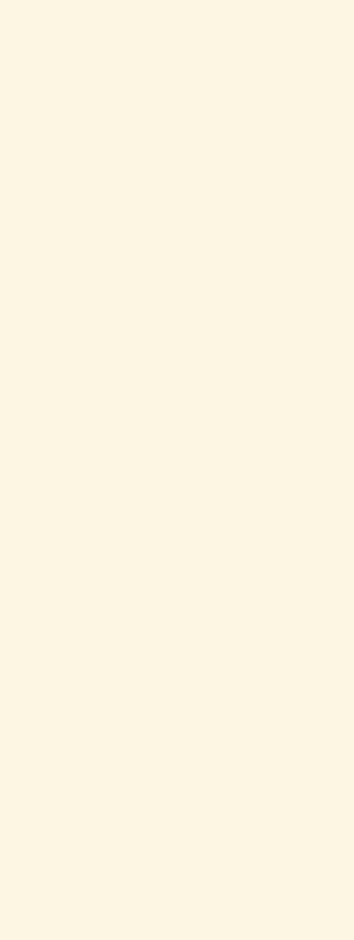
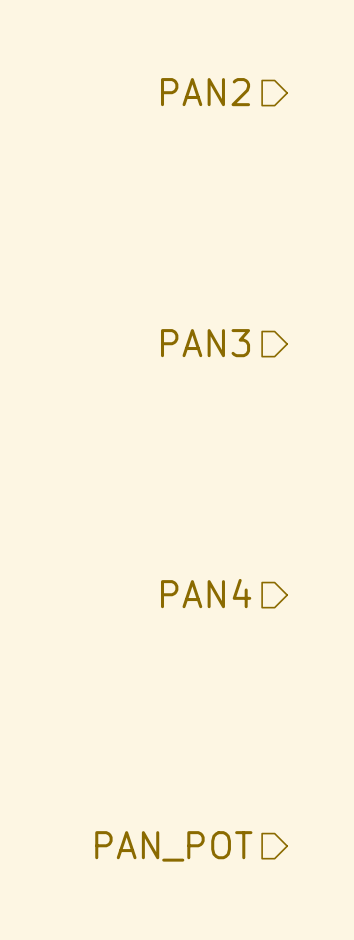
hierarchical label: none -> PAN2 (205, 92)
hierarchical label: none -> PAN3 (205, 343)
hierarchical label: none -> PAN4 (206, 593)
hierarchical label: none -> PAN_POT (173, 846)

